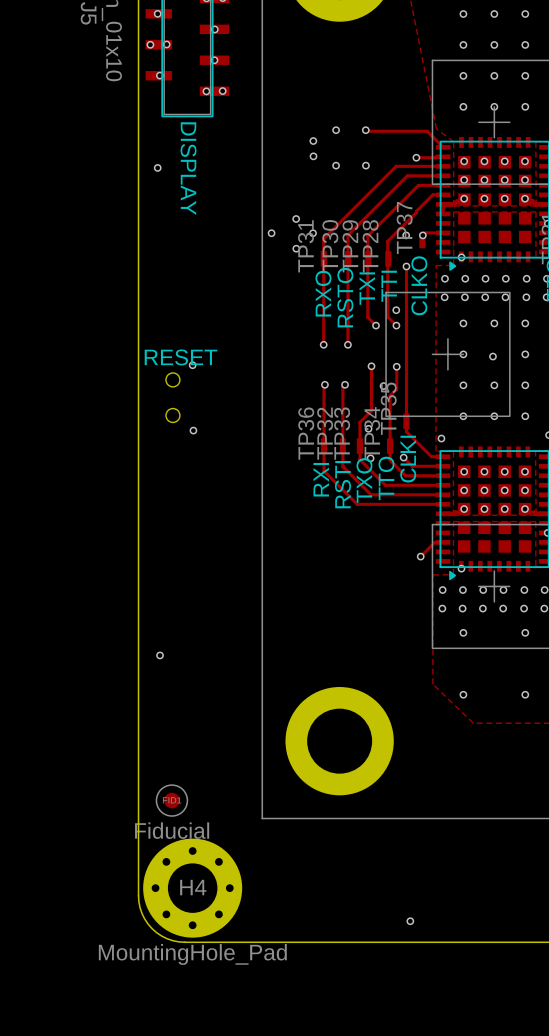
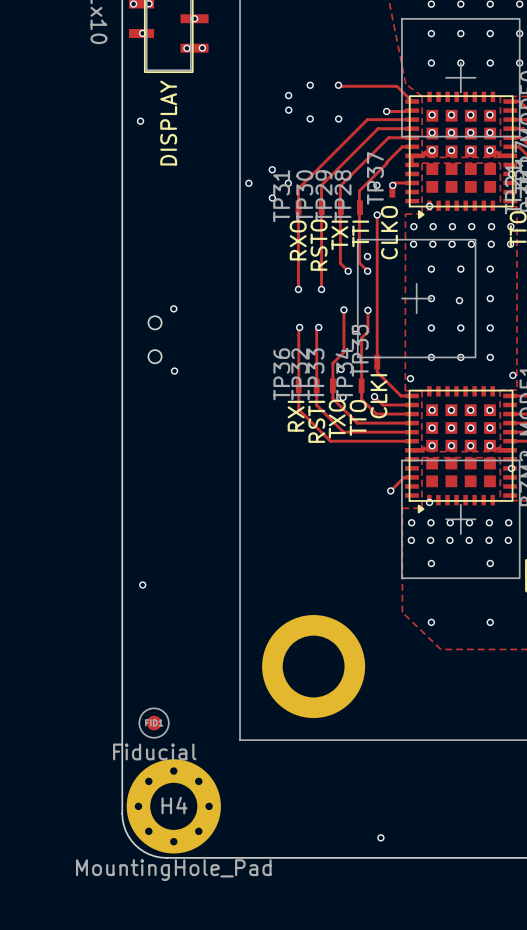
text rotation: 0° (188, 168) -> 180° (168, 123)
text: RESET (181, 357) -> none

